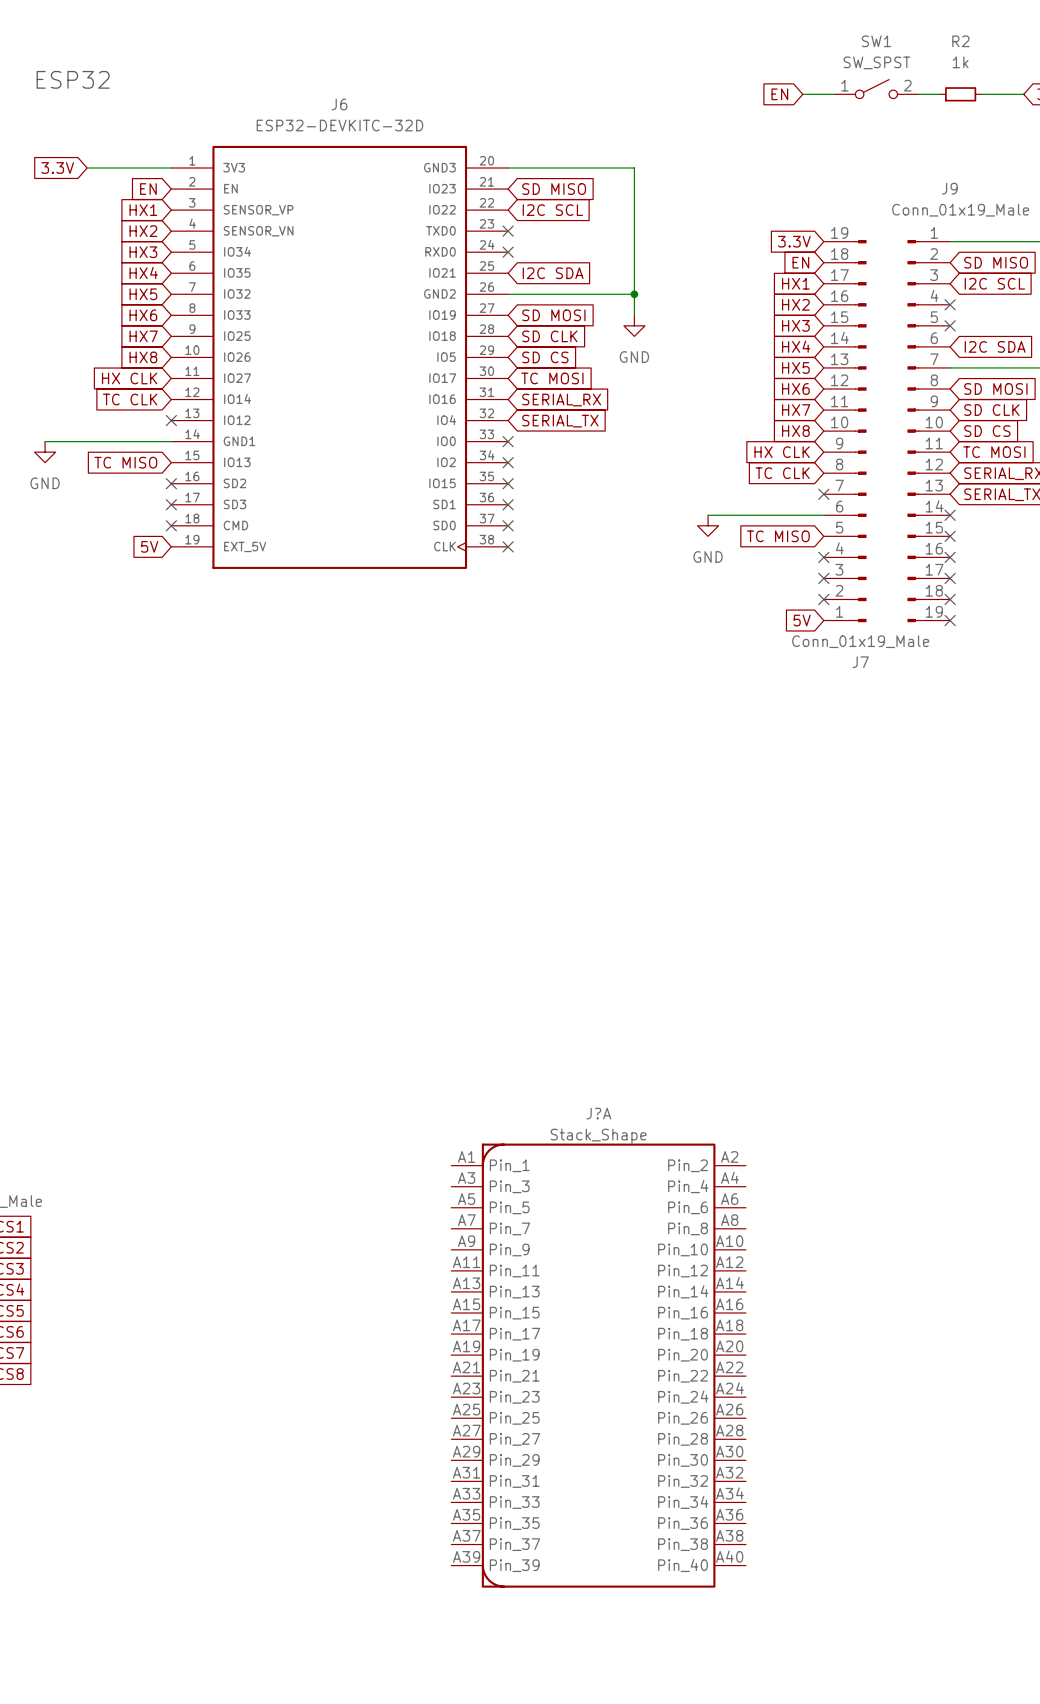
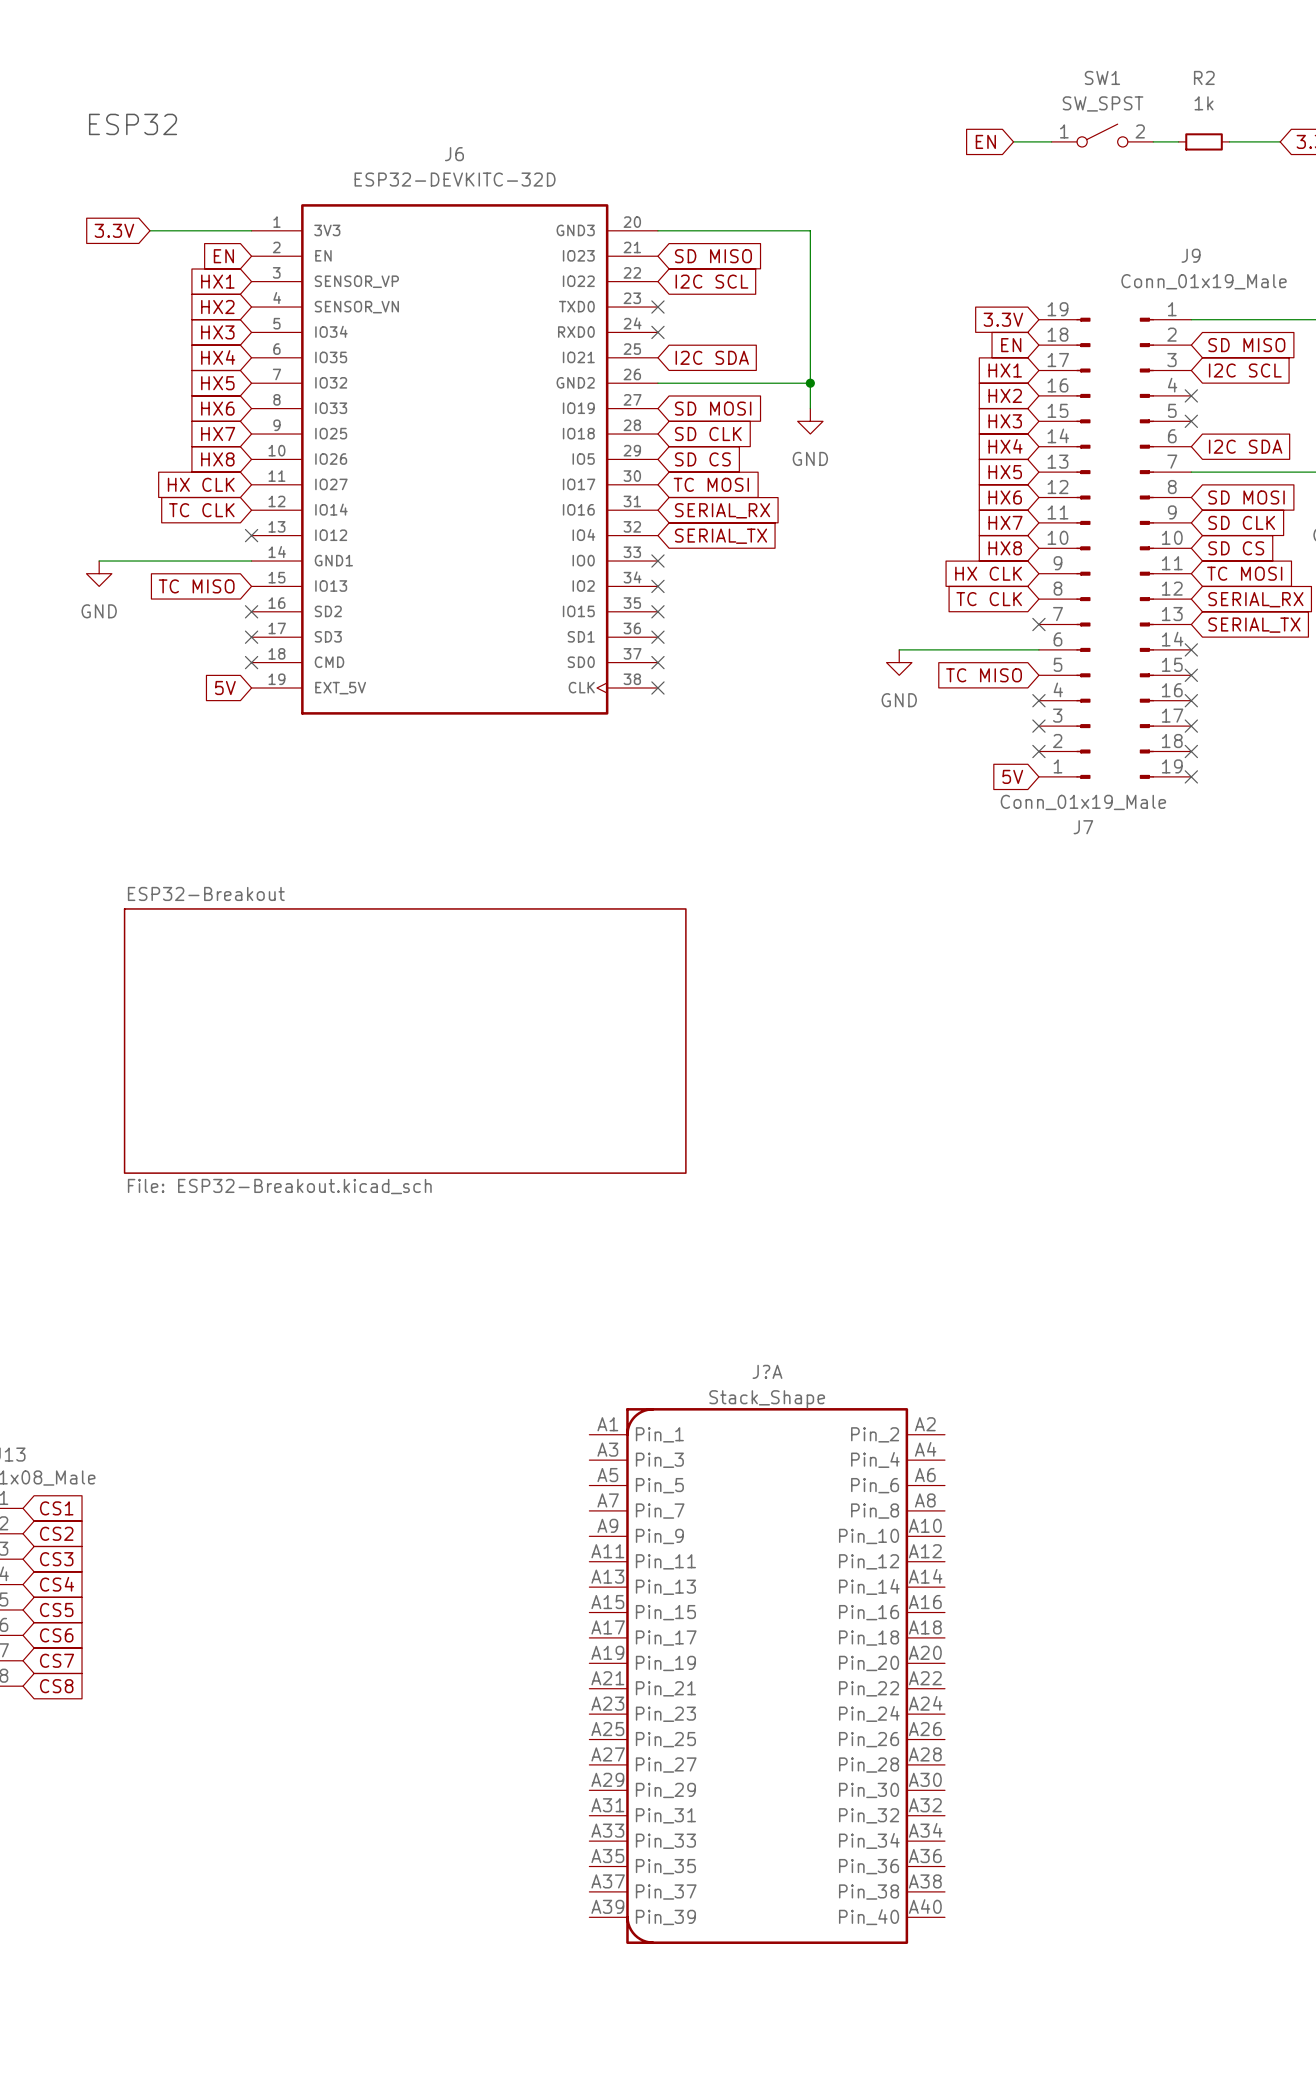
sheet ESP32-Breakout: none -> File: ESP32-Breakout.kicad_sch (405, 1041)

